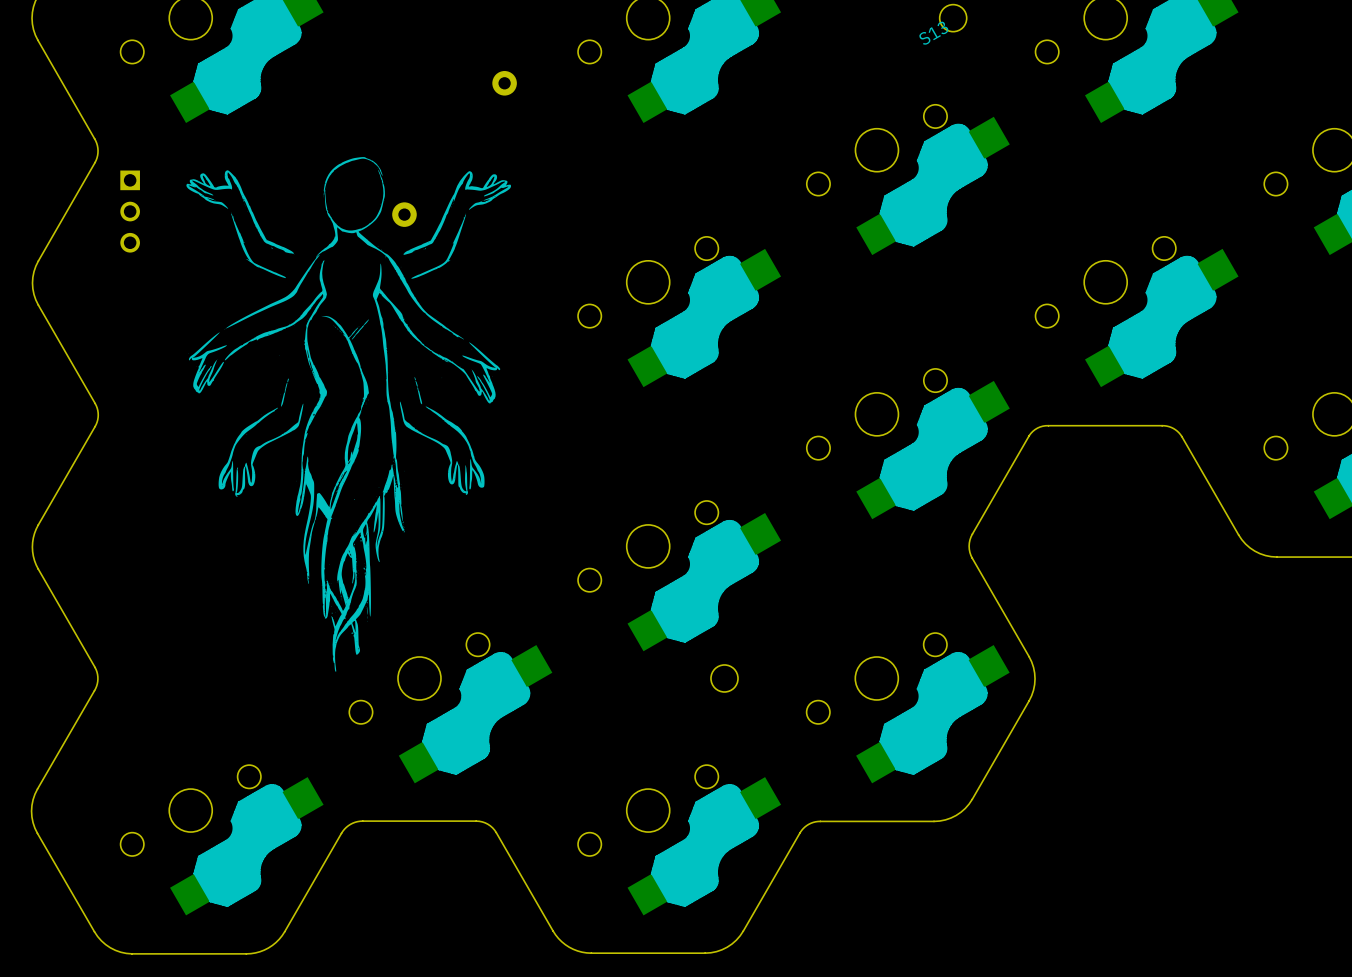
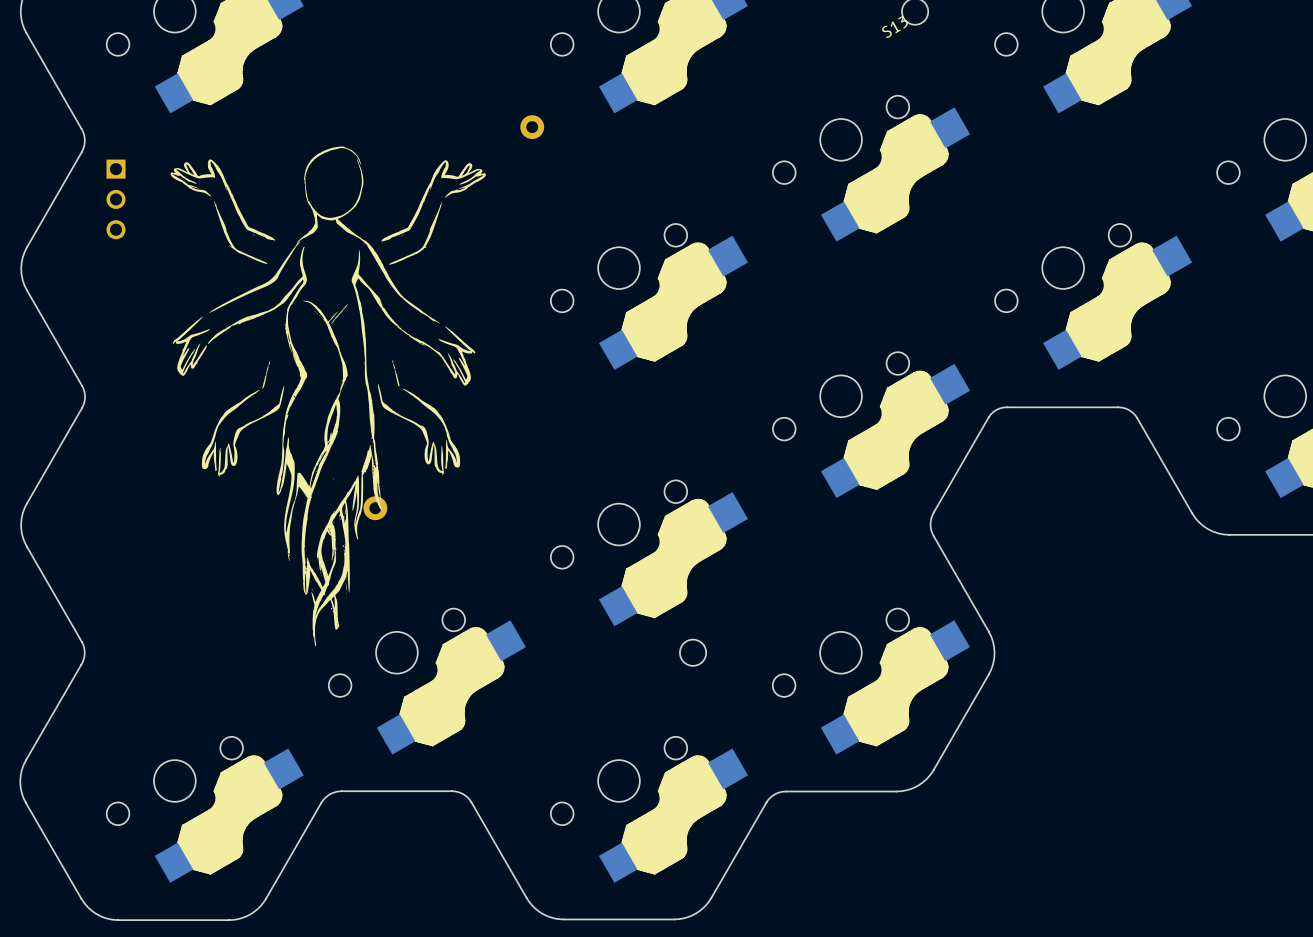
part position: (504, 83) -> (532, 127)
part: (404, 214) -> none
part: none -> (375, 508)

